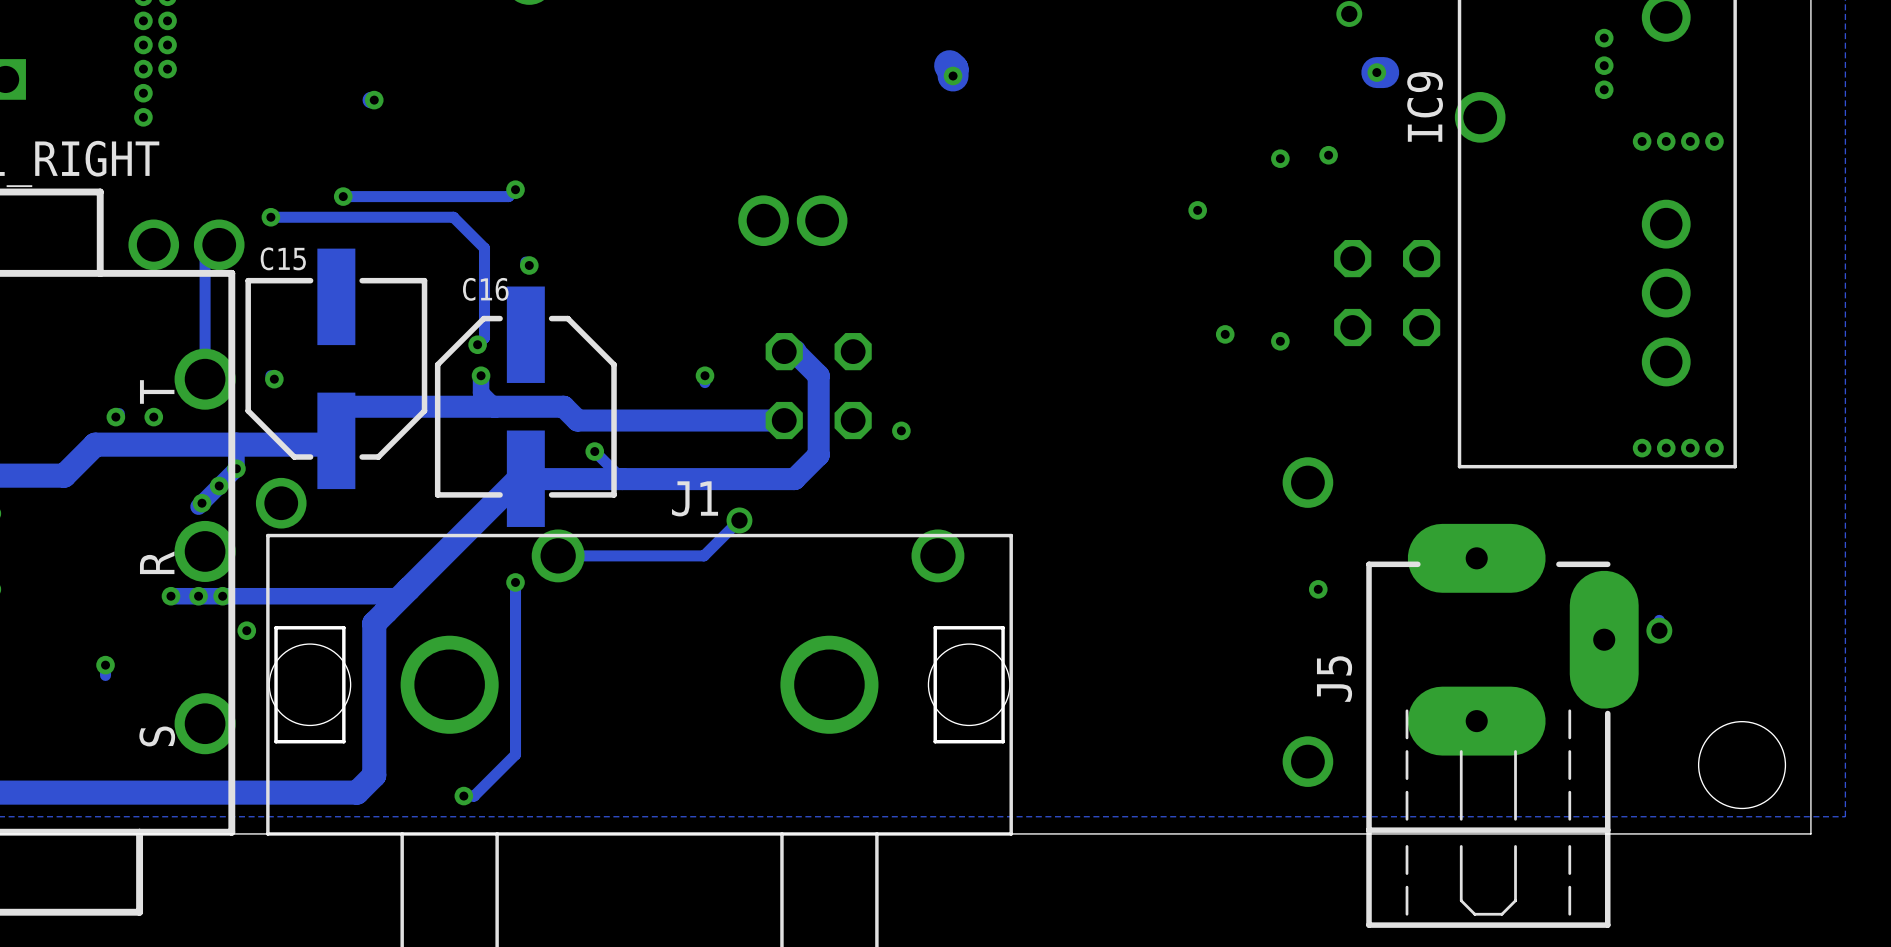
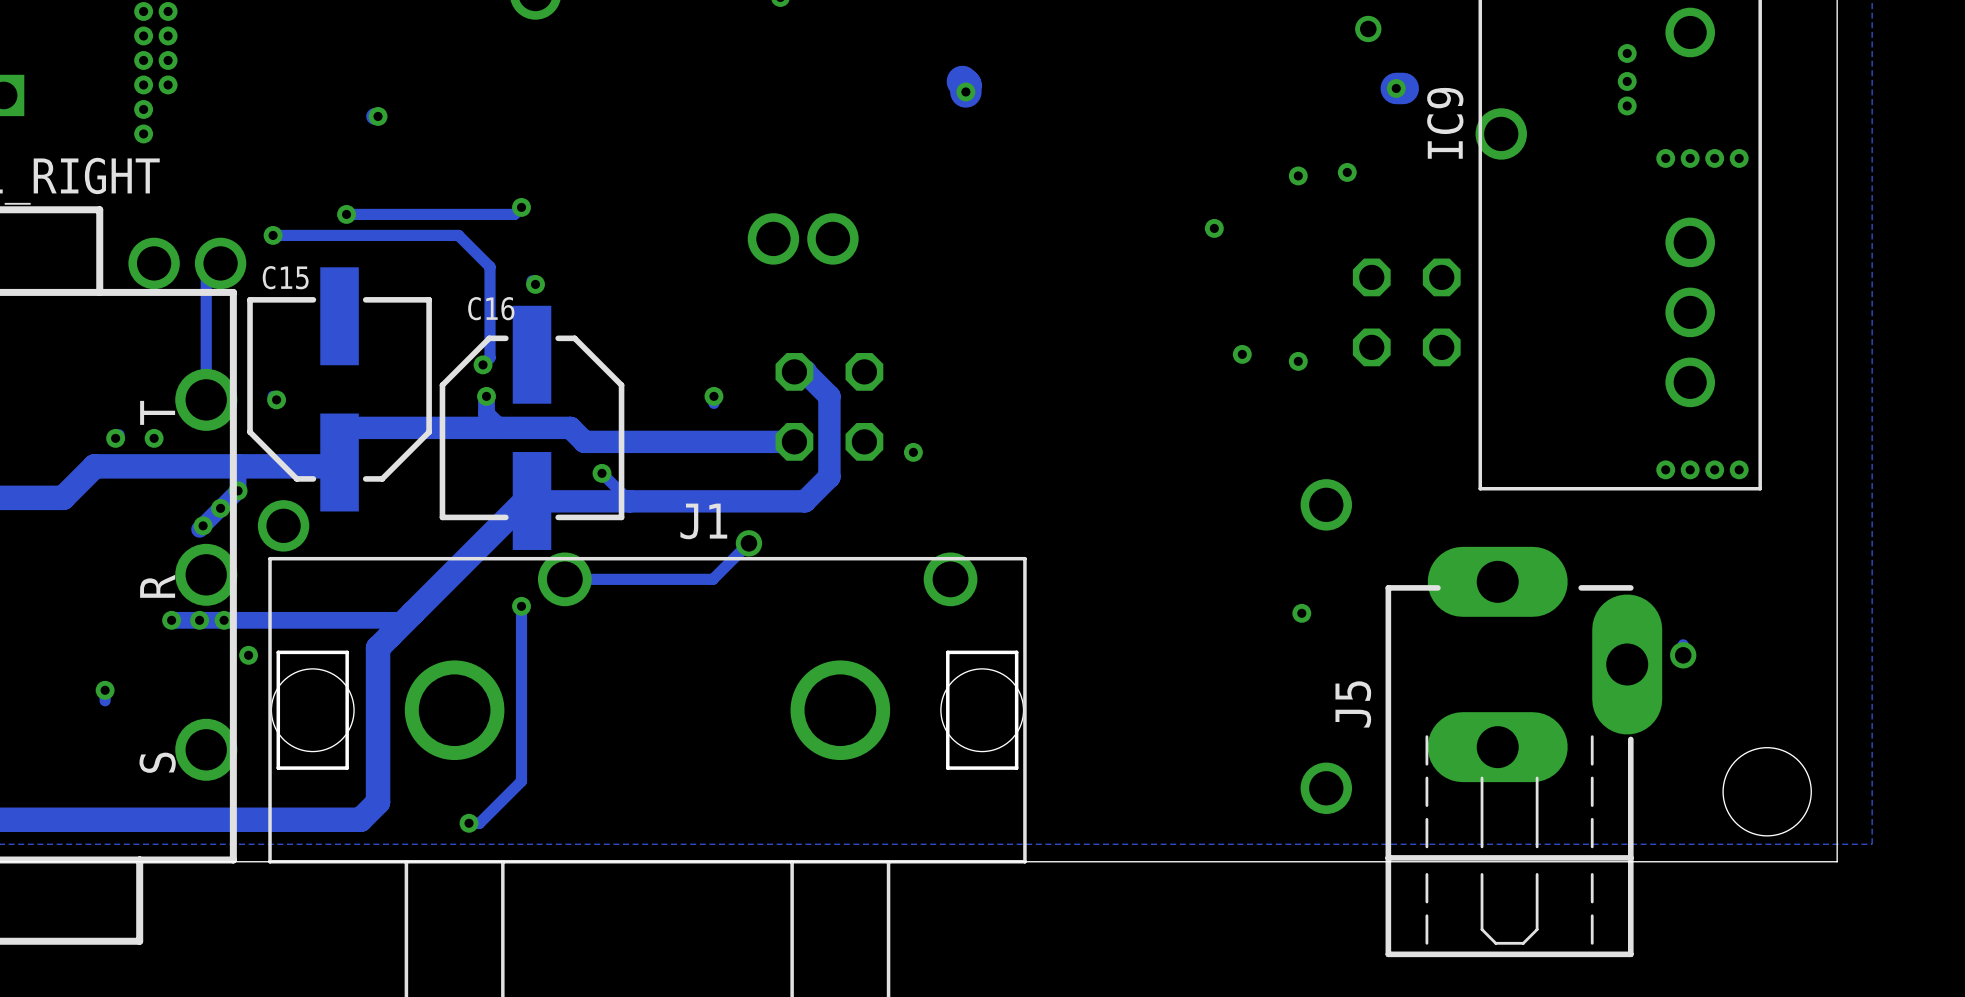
J5 footprint: [1366, 523, 1639, 928] -> [1385, 546, 1663, 958]
via position: (1318, 589) -> (1301, 613)

